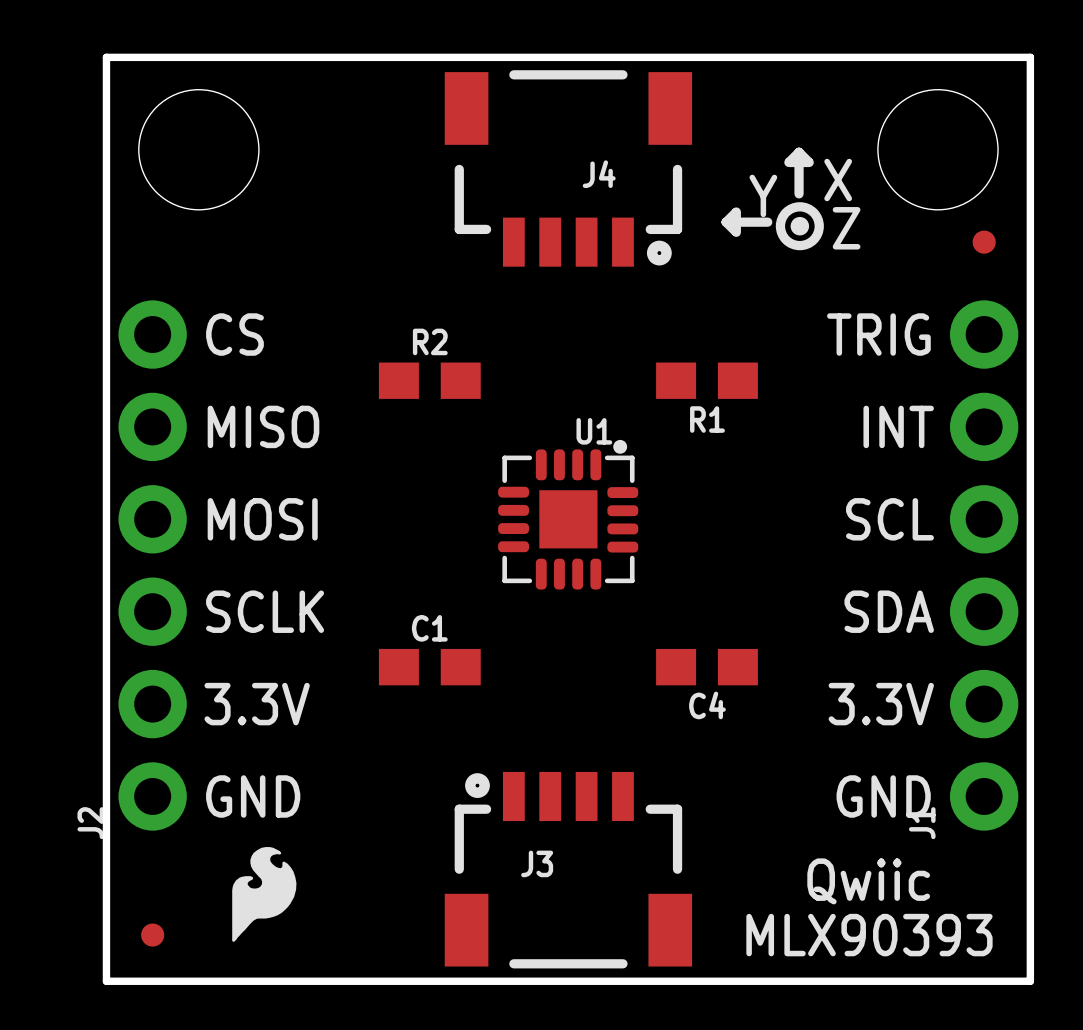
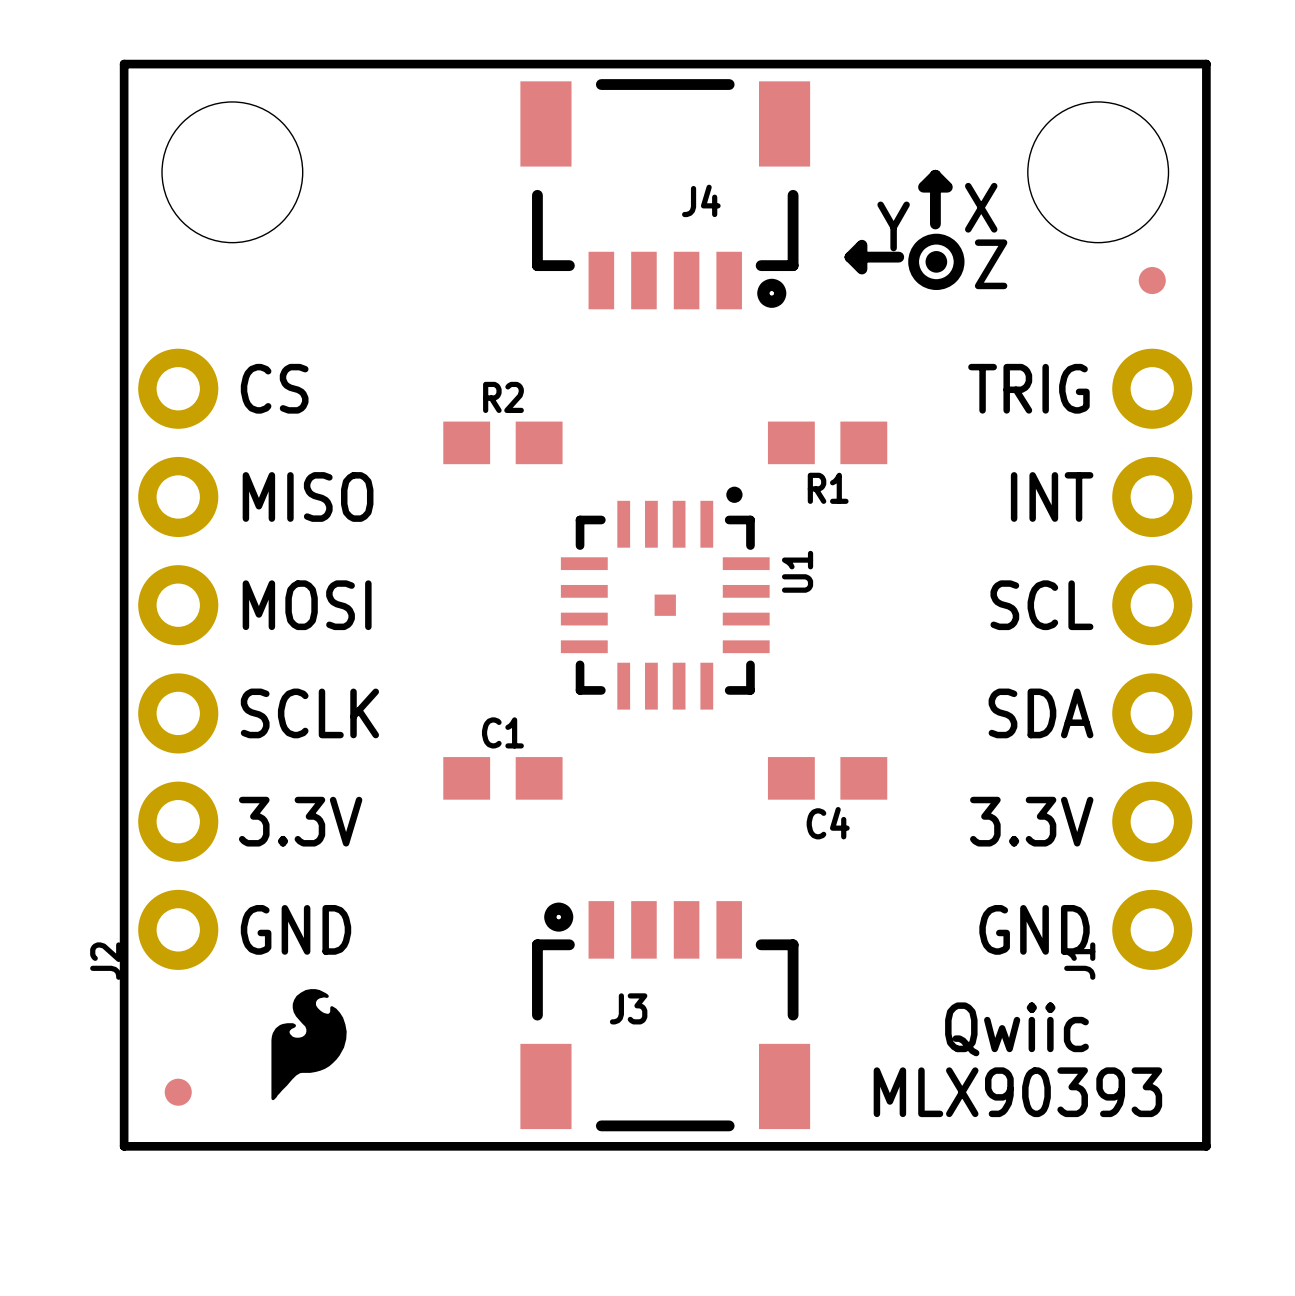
U1 name rotation: 0° (594, 431) -> 90° counterclockwise (797, 571)
U1 name position: U1 (594, 431) -> U1 (797, 571)
U1 footprint: [498, 439, 639, 590] -> [560, 486, 770, 710]

